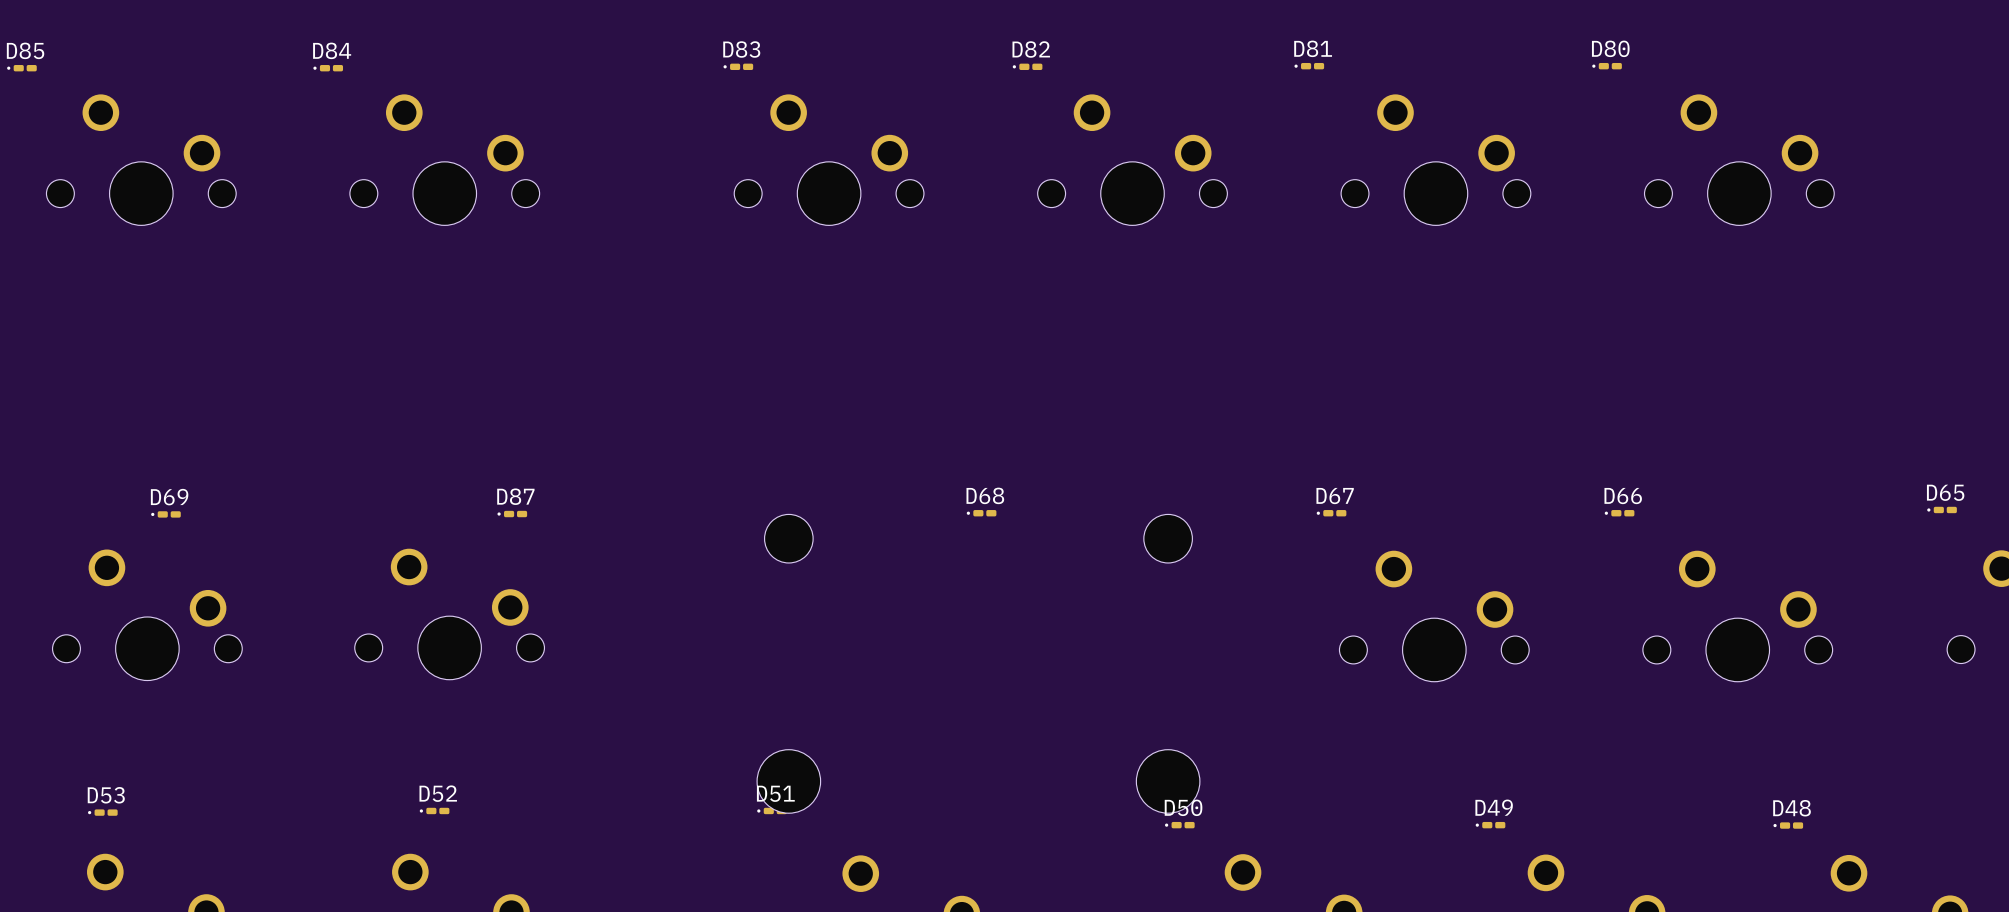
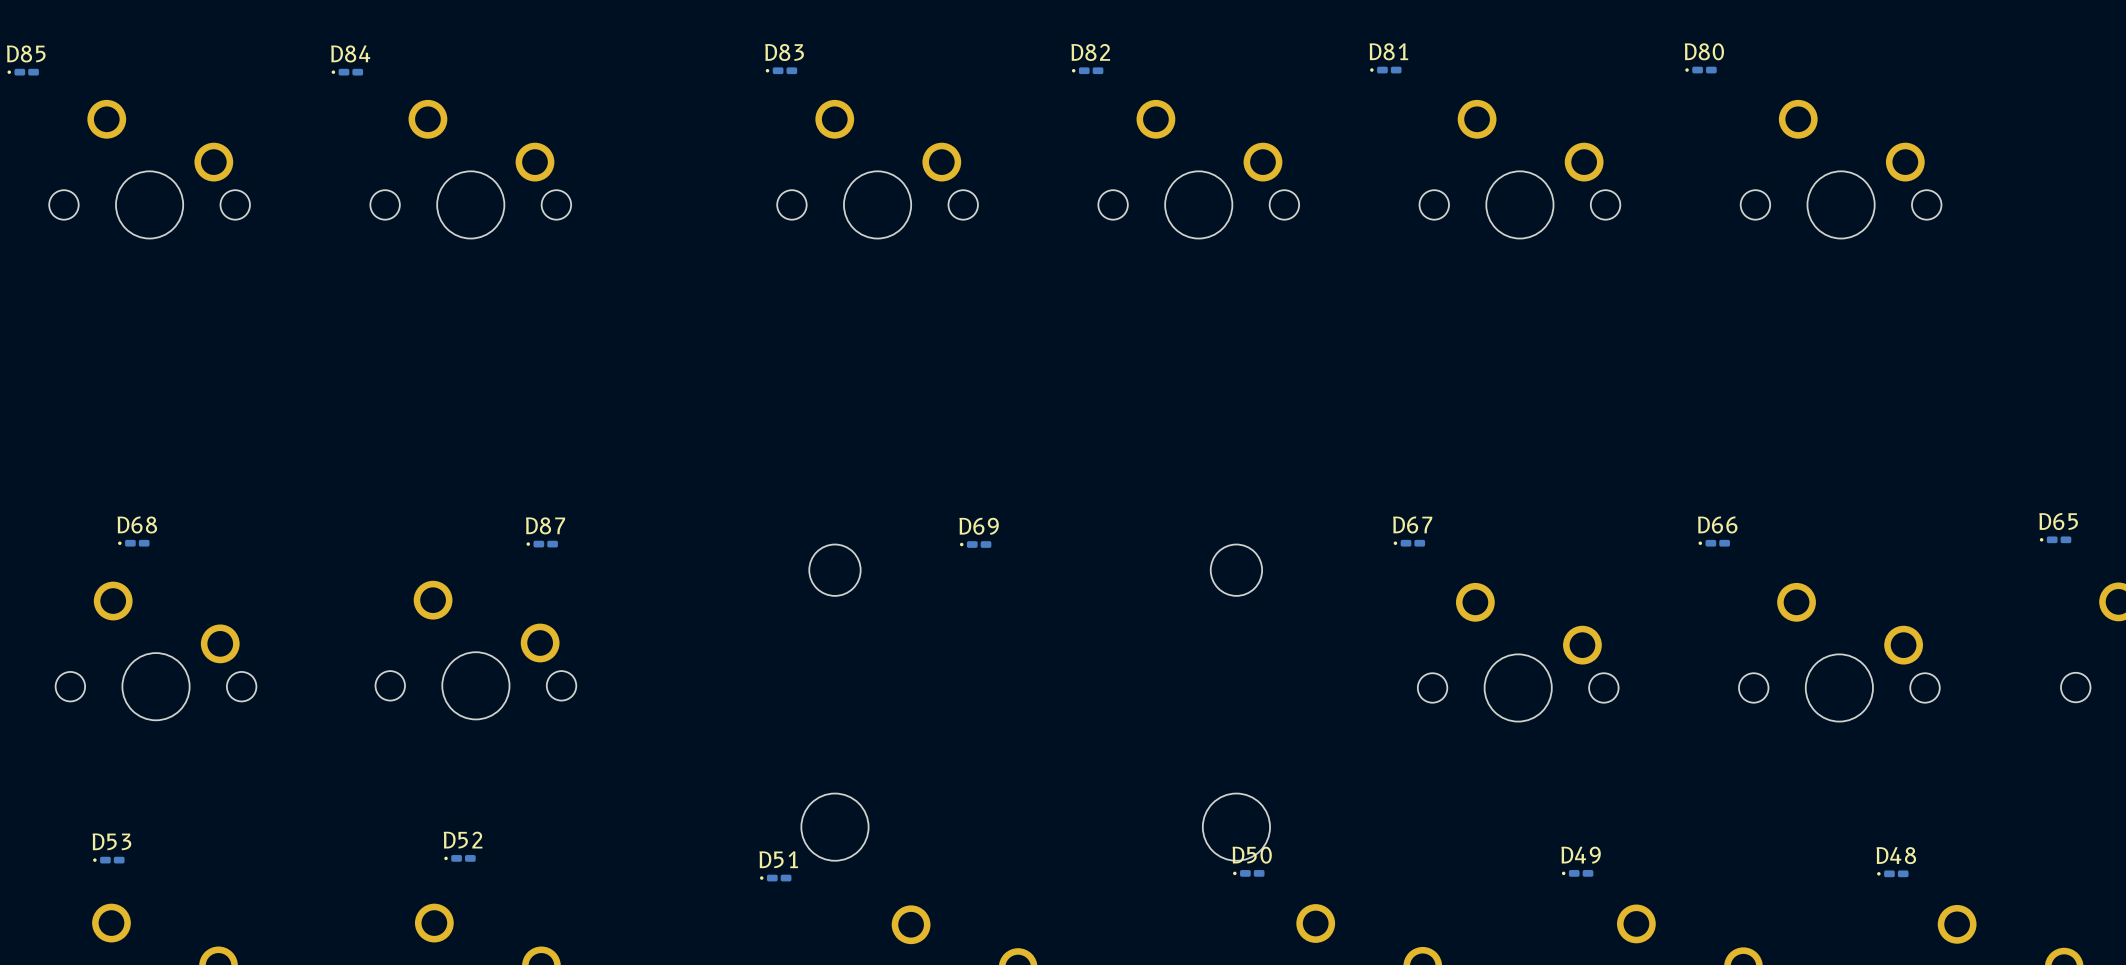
D68 position: (981, 513) -> (133, 543)
D69 position: (165, 514) -> (975, 544)
D51 position: (772, 810) -> (775, 878)

